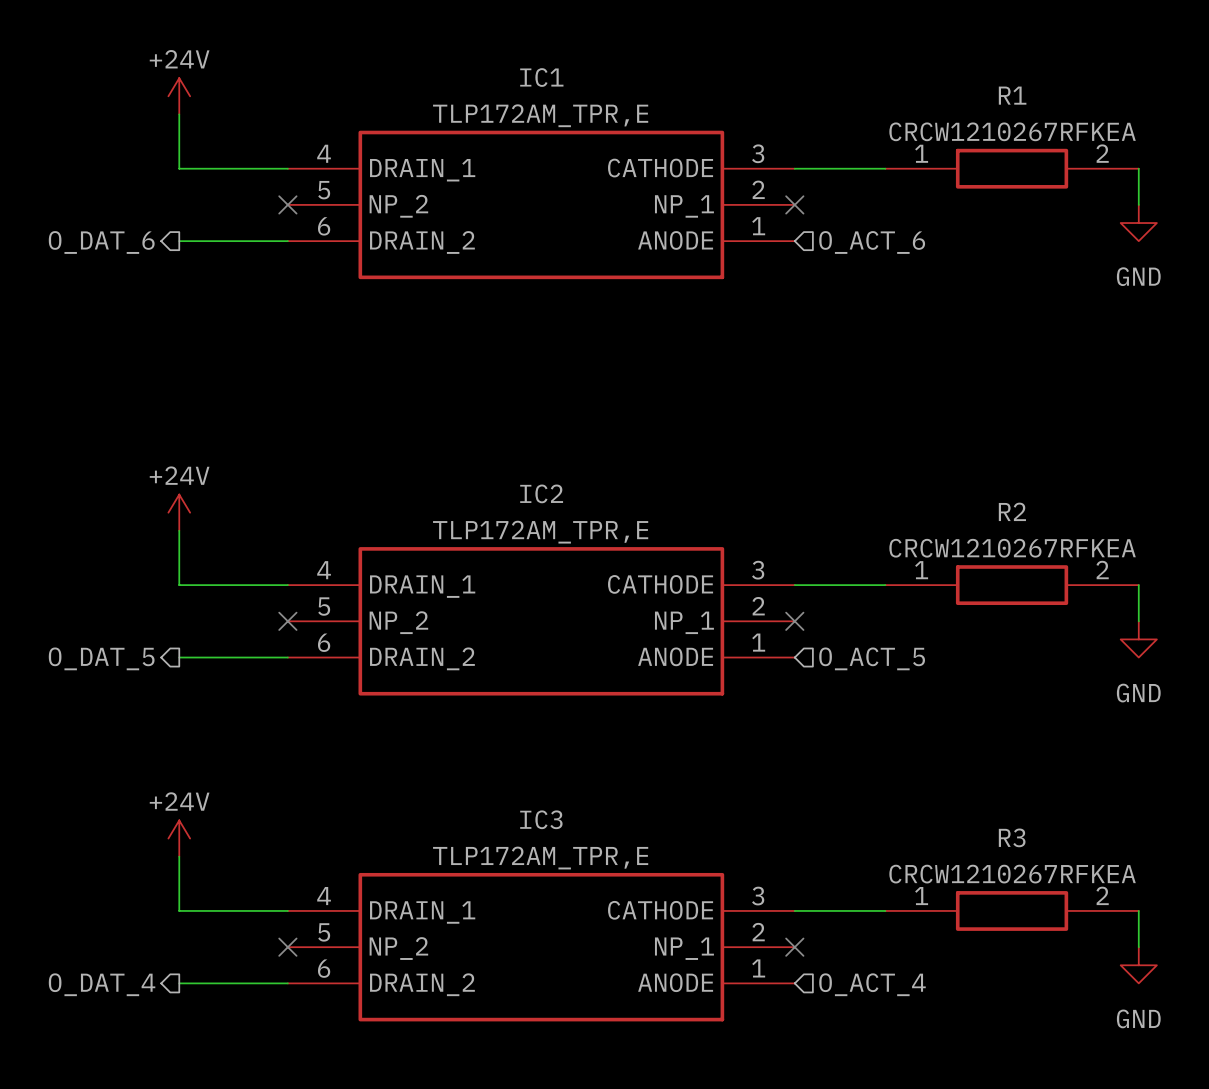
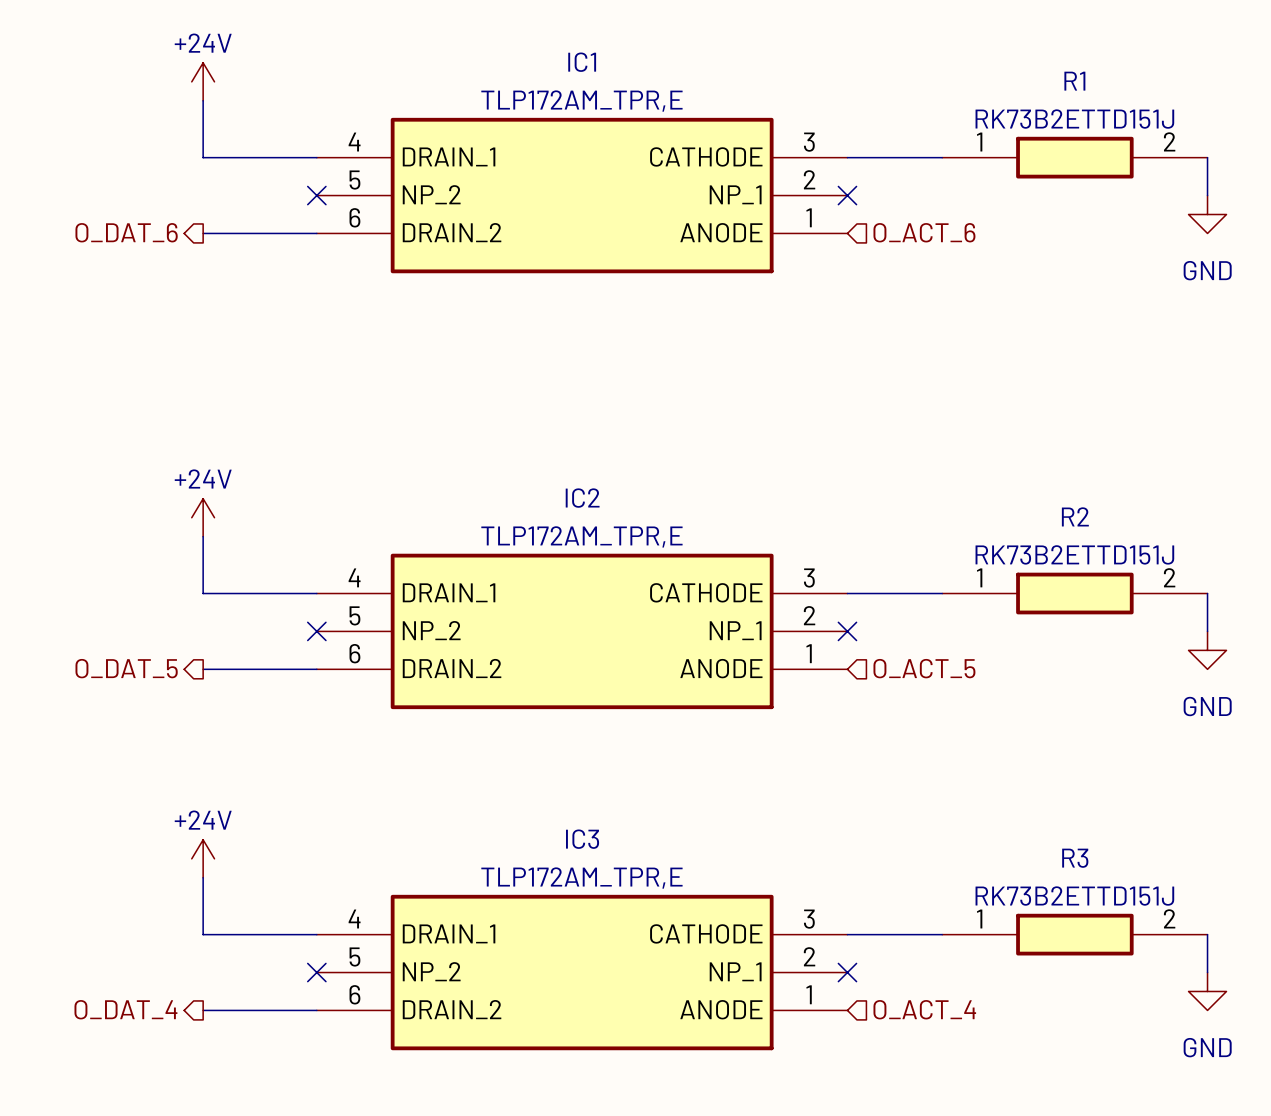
R1 value: CRCW1210267RFKEA (1012, 131) -> RK73B2ETTD151J (1074, 119)
R2 value: CRCW1210267RFKEA (1012, 548) -> RK73B2ETTD151J (1074, 554)
R3 value: CRCW1210267RFKEA (1012, 874) -> RK73B2ETTD151J (1074, 896)

